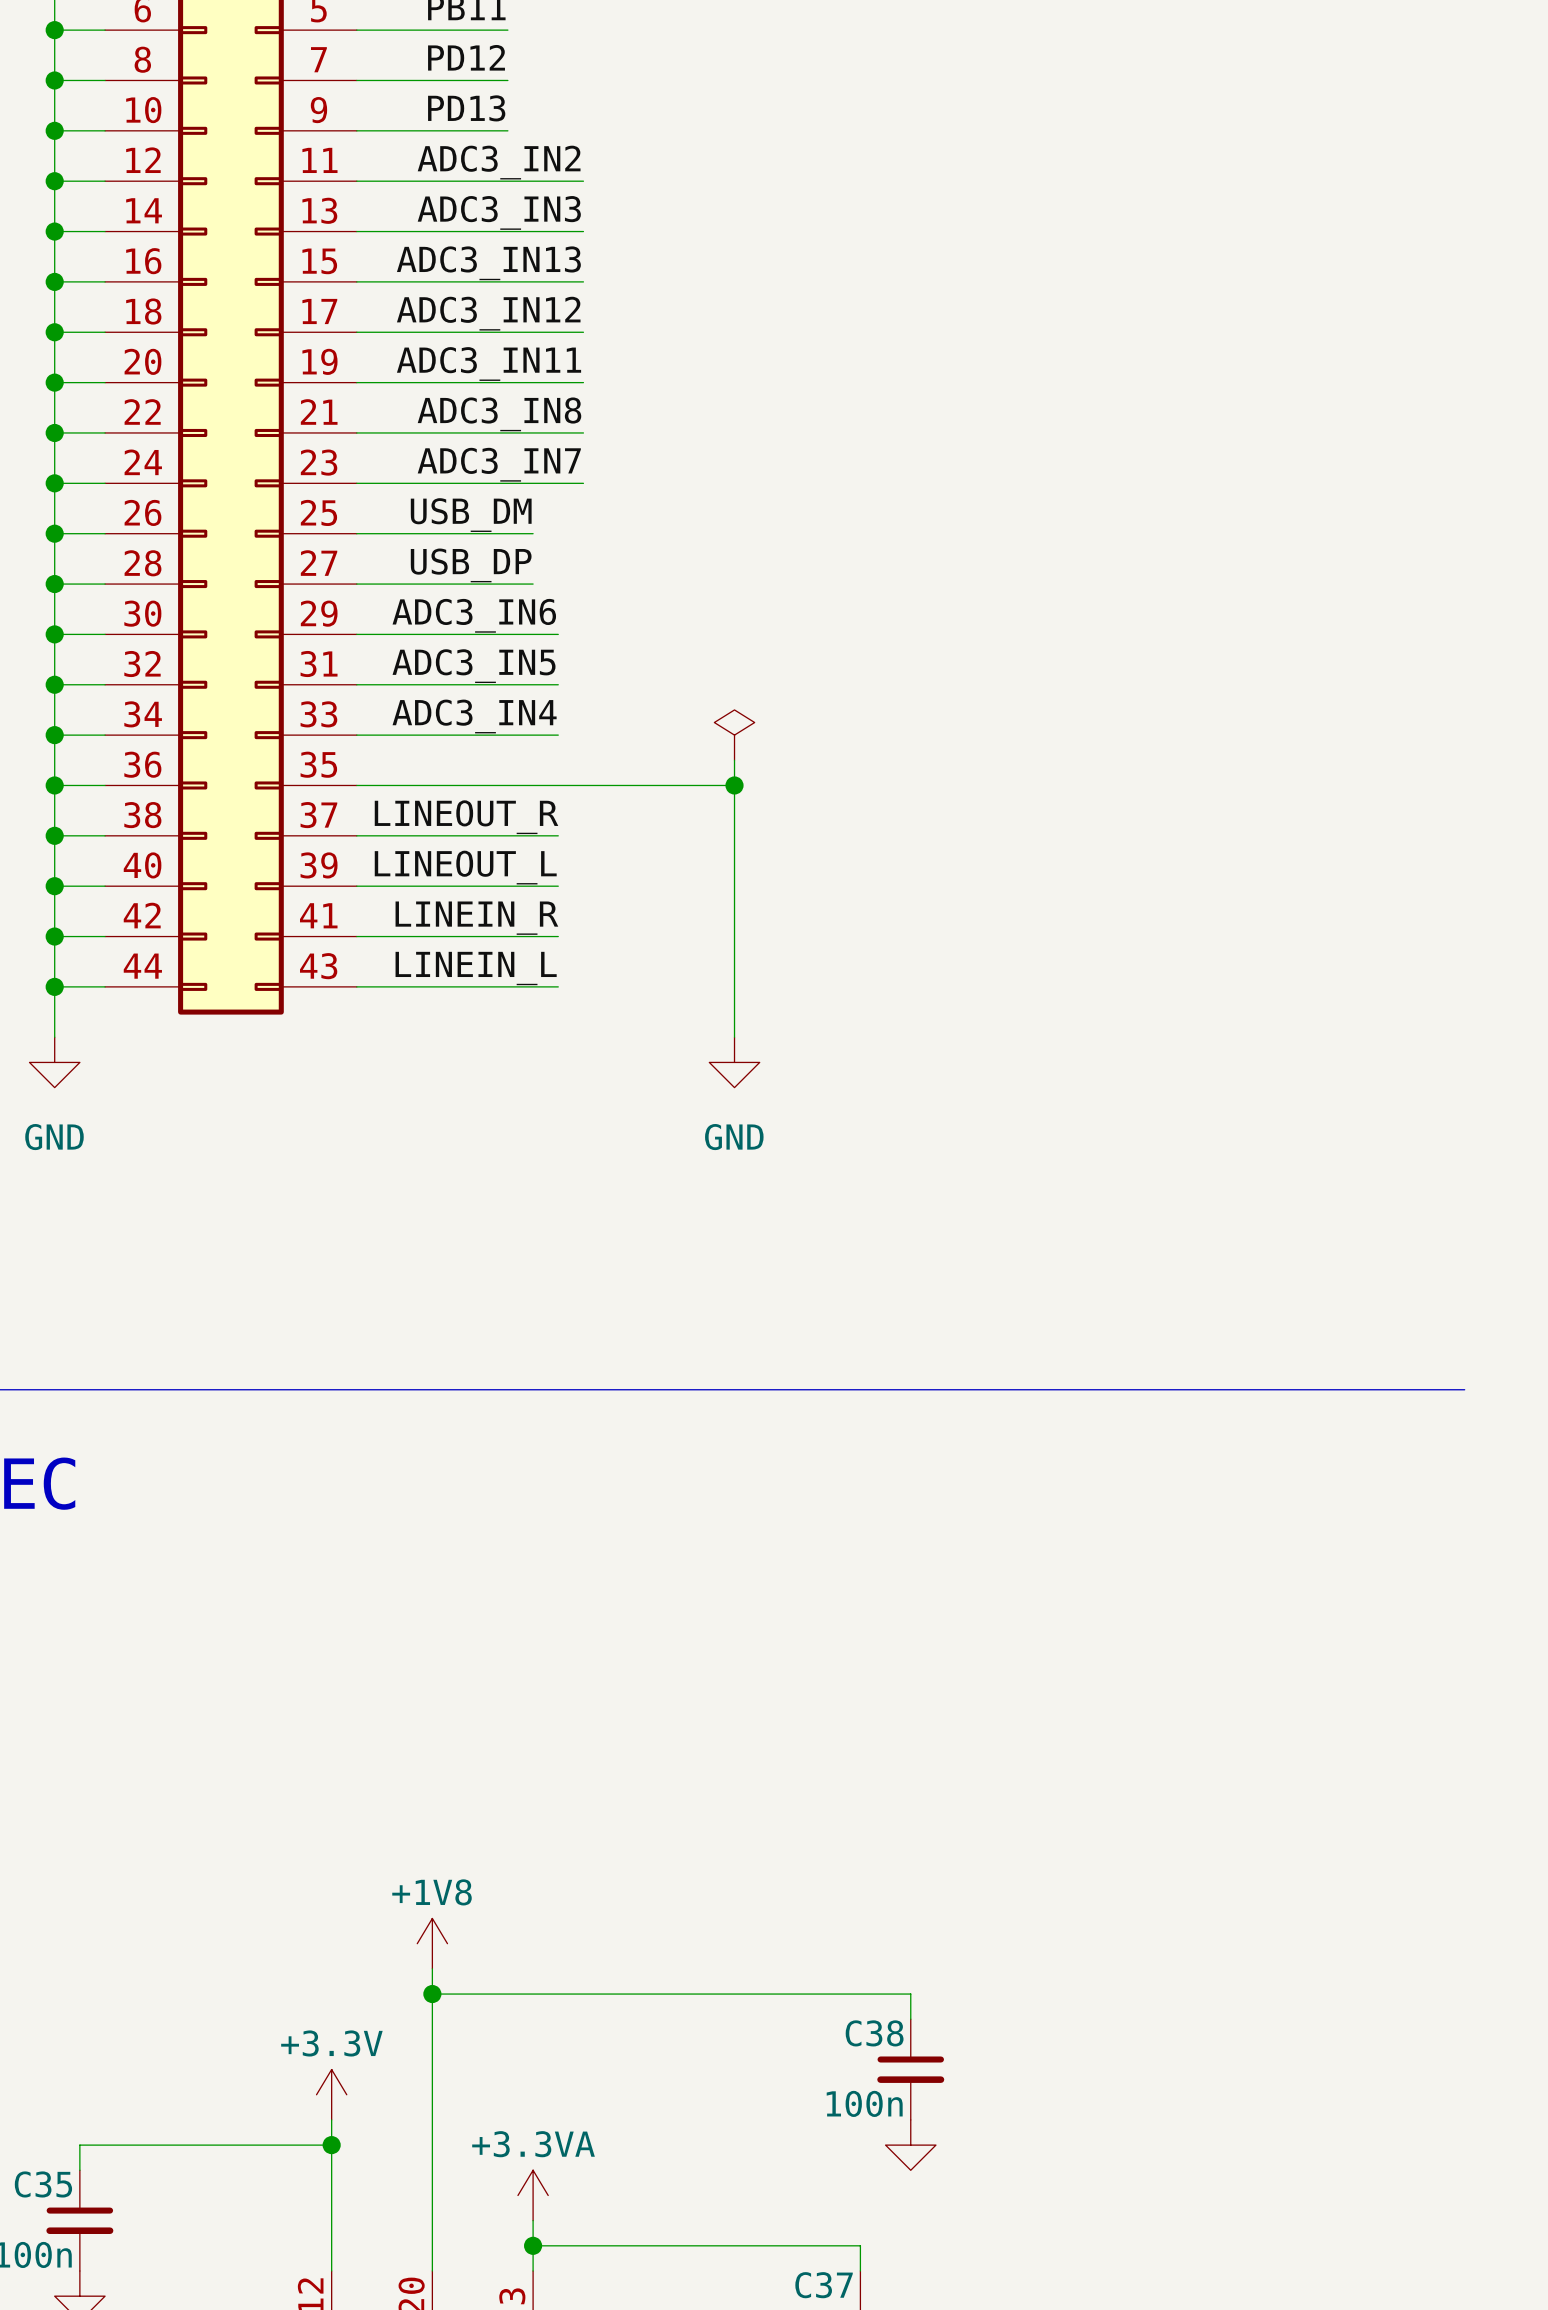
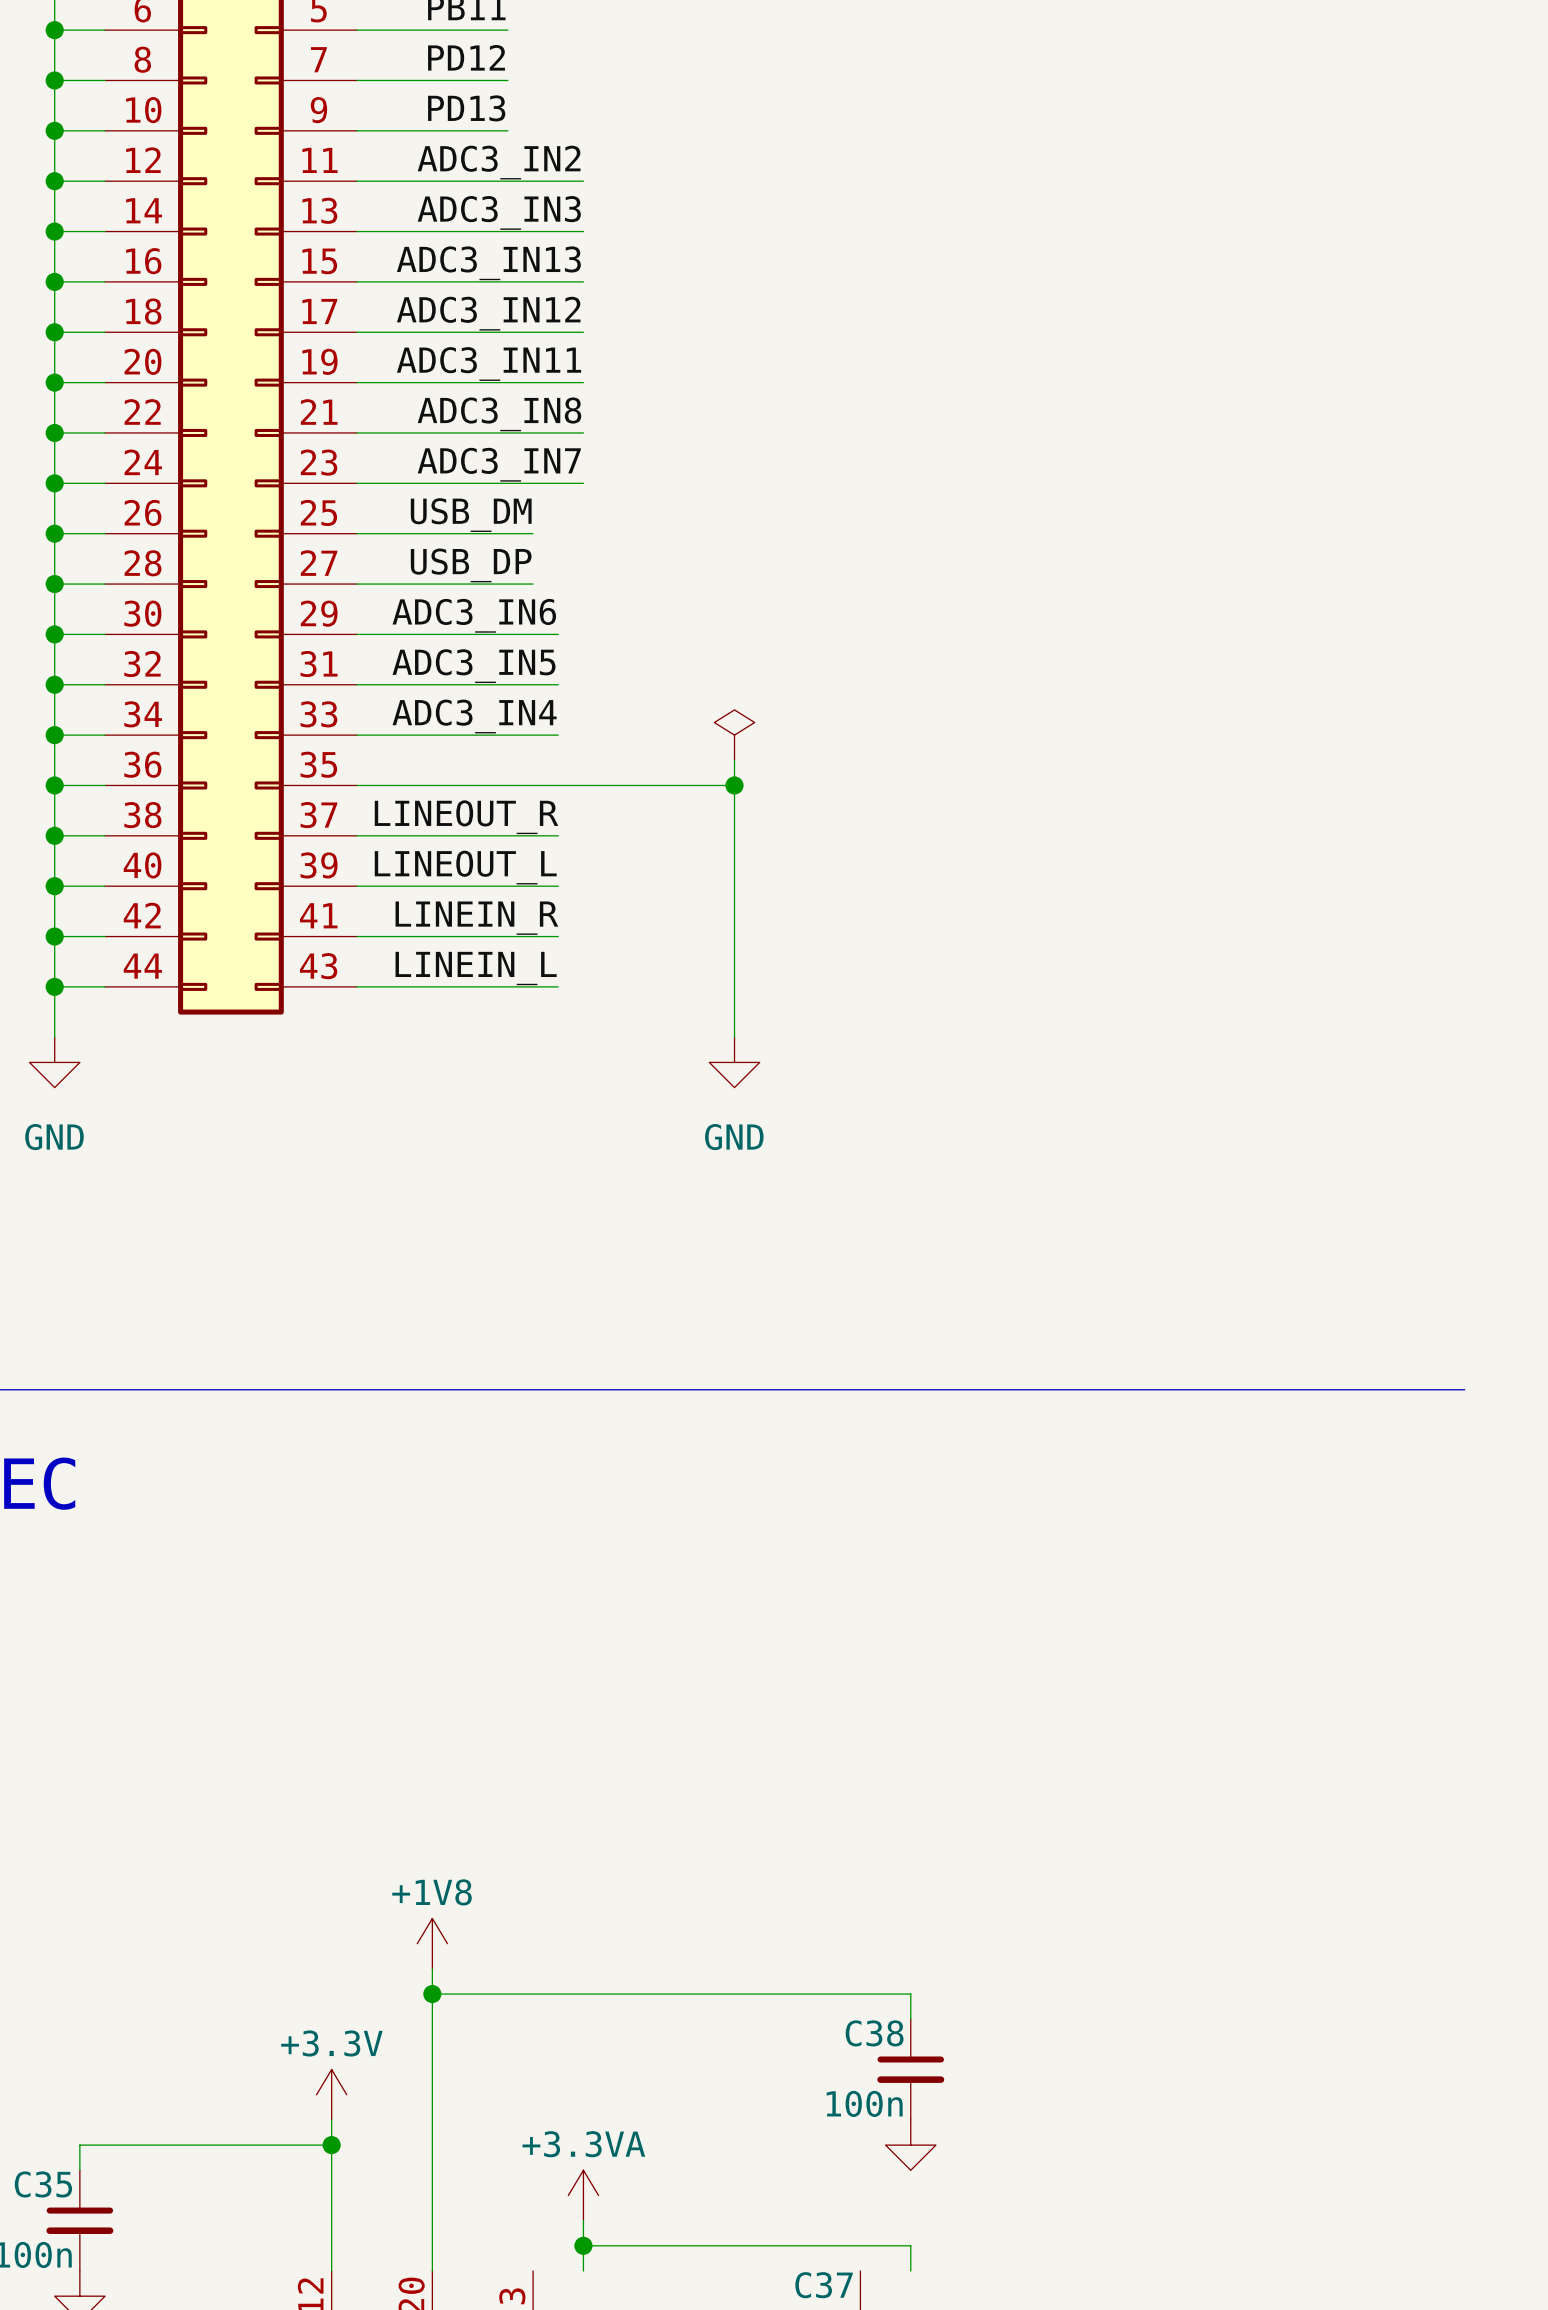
power symbol position: +3.3VA (533, 2195) -> +3.3VA (583, 2195)
wire: (533, 2220) (533, 2271) -> (583, 2220) (583, 2271)
wire: (533, 2245) (583, 2245) -> none
junction position: (533, 2245) -> (583, 2245)
wire: (860, 2245) (860, 2271) -> (860, 2245) (910, 2245) (910, 2271)

